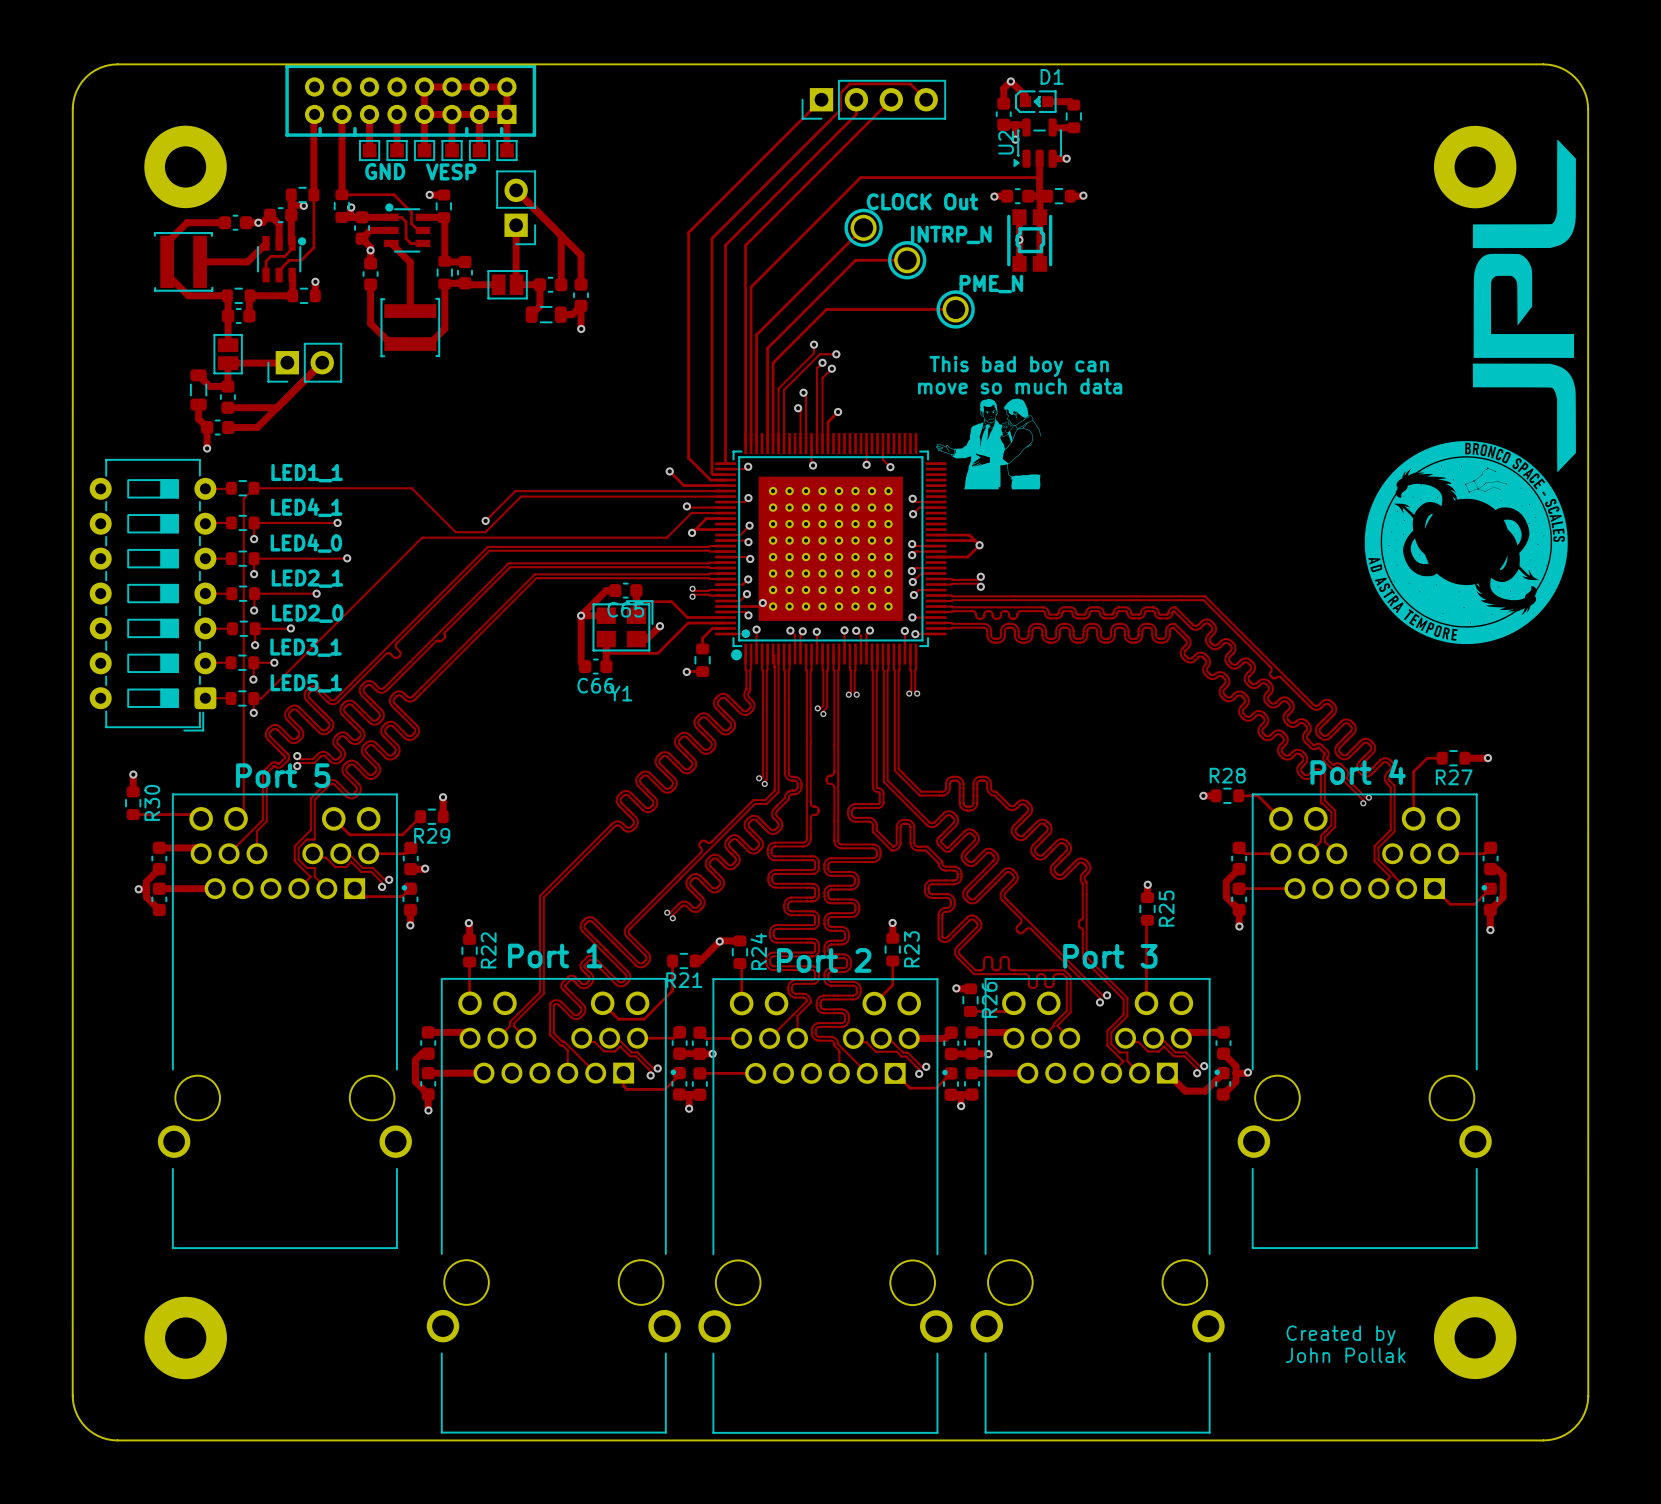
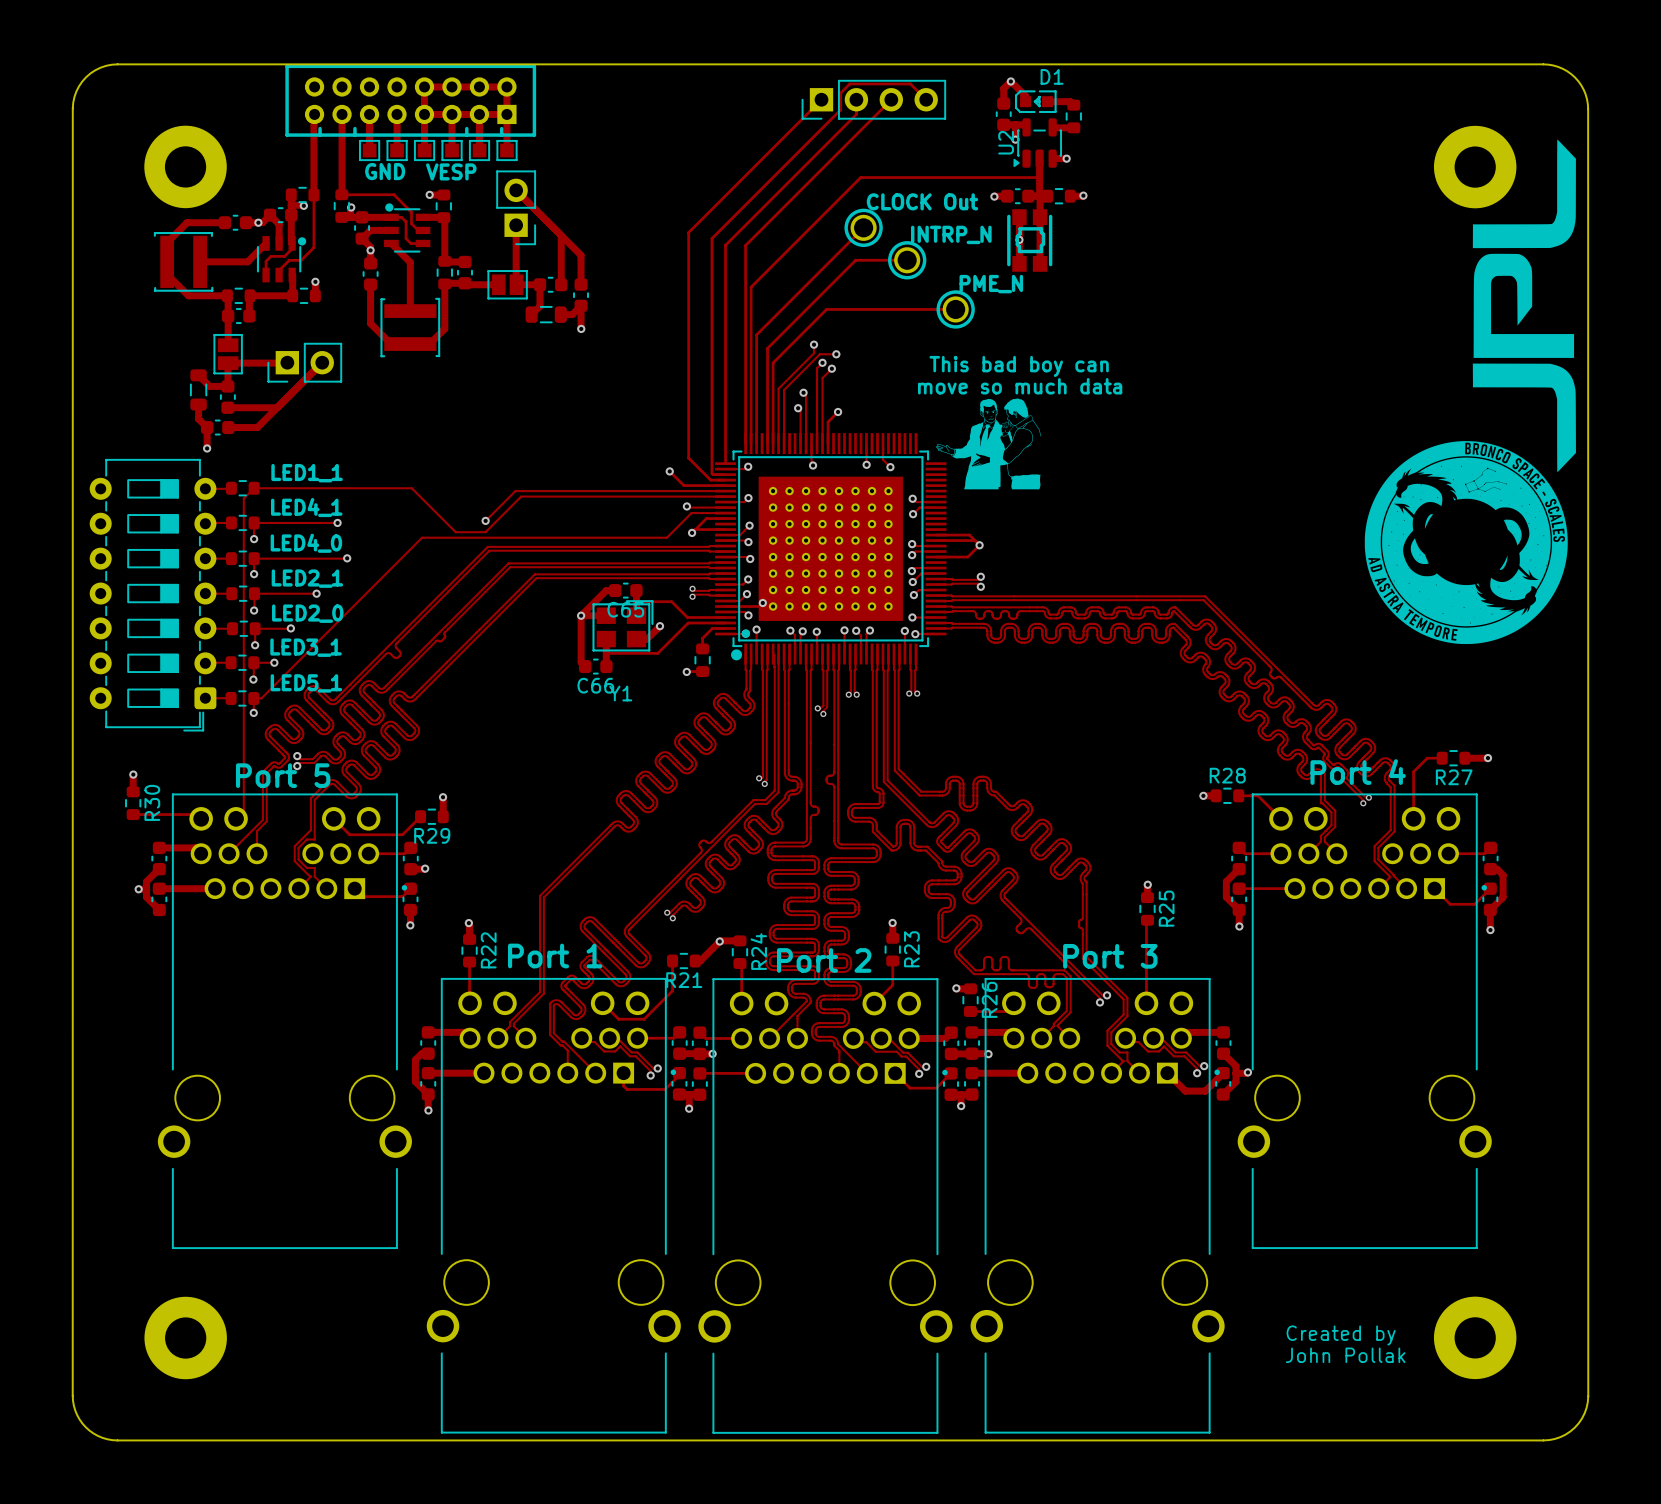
track: (312, 853) (316, 857) (325, 857) (335, 867) (346, 867) (351, 861) (361, 871) (371, 871) (382, 882) (382, 886) -> none
track: (340, 853) (348, 853) (362, 868) (372, 868) (384, 879) (389, 879) -> none
via: (389, 879) -> none
via: (382, 886) -> none

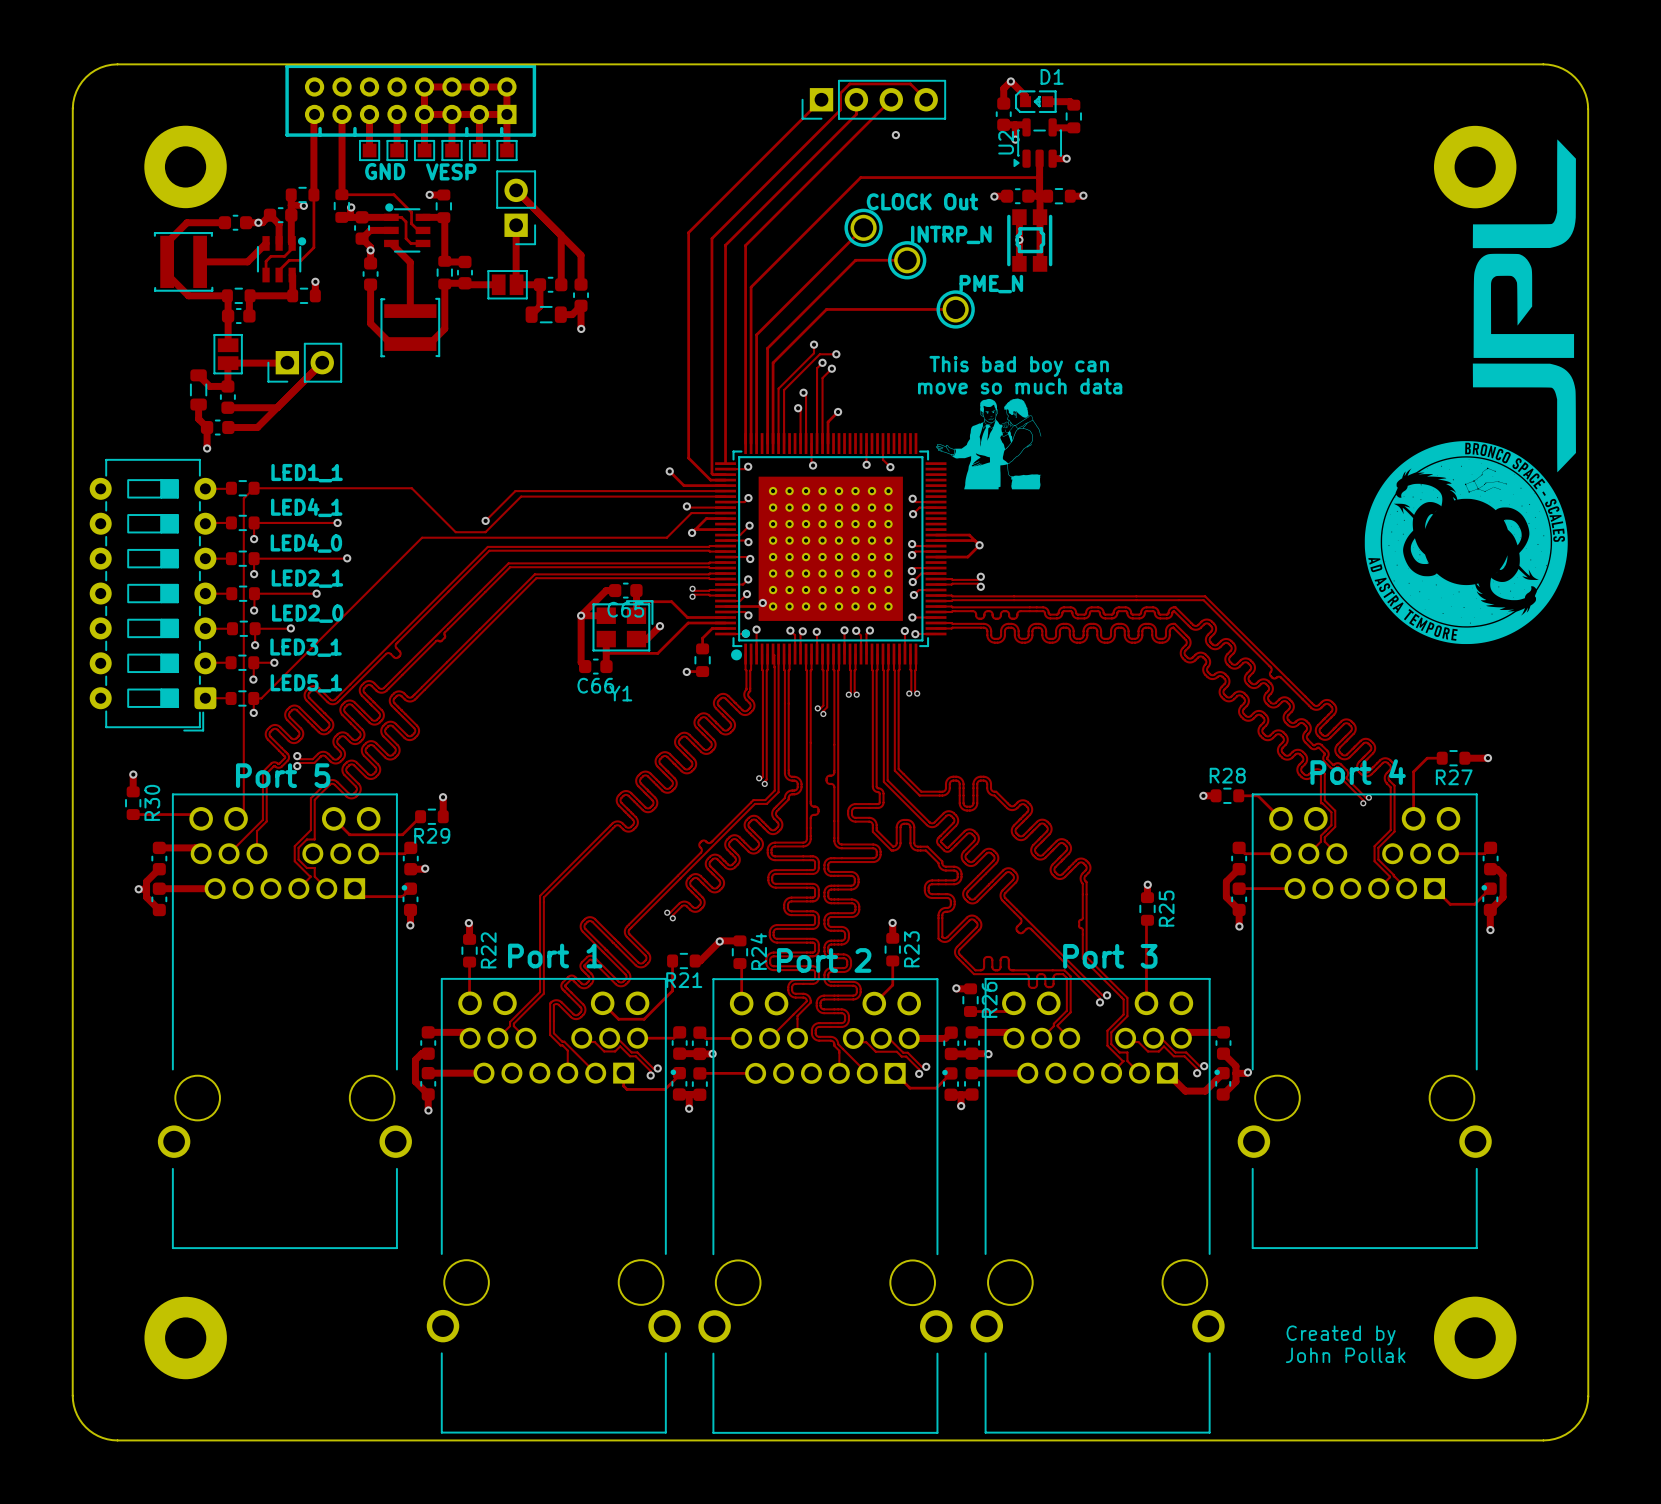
via: none -> (895, 135)

